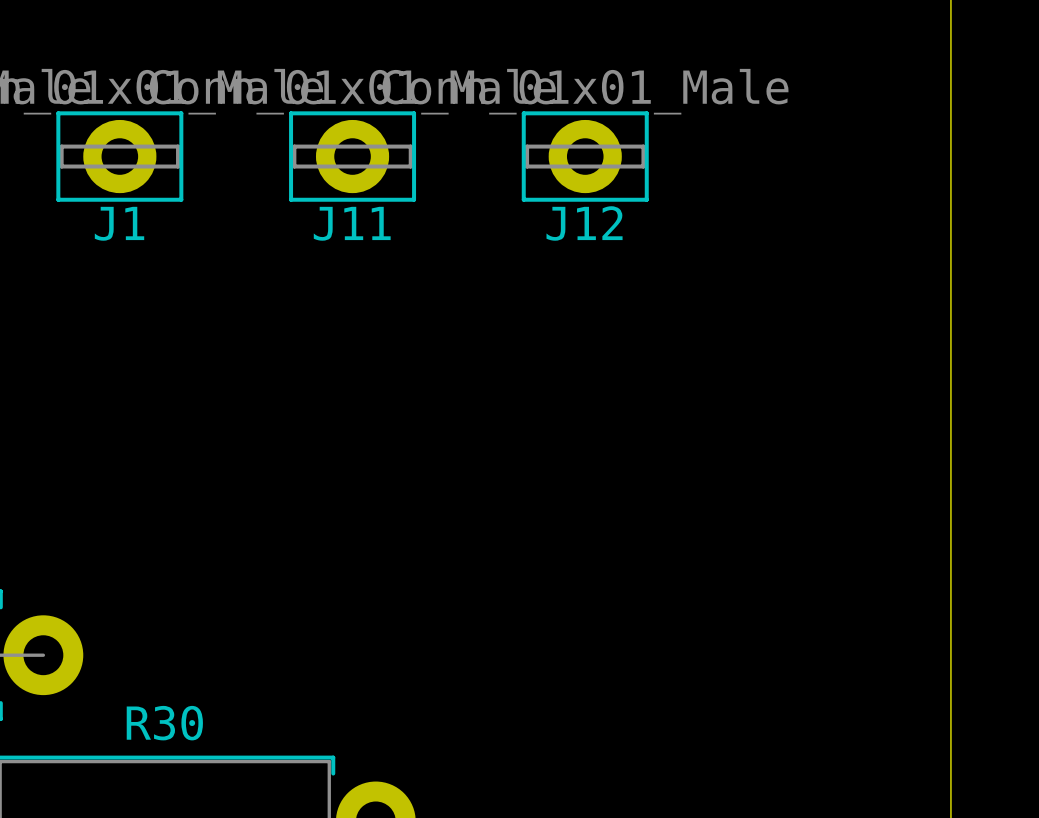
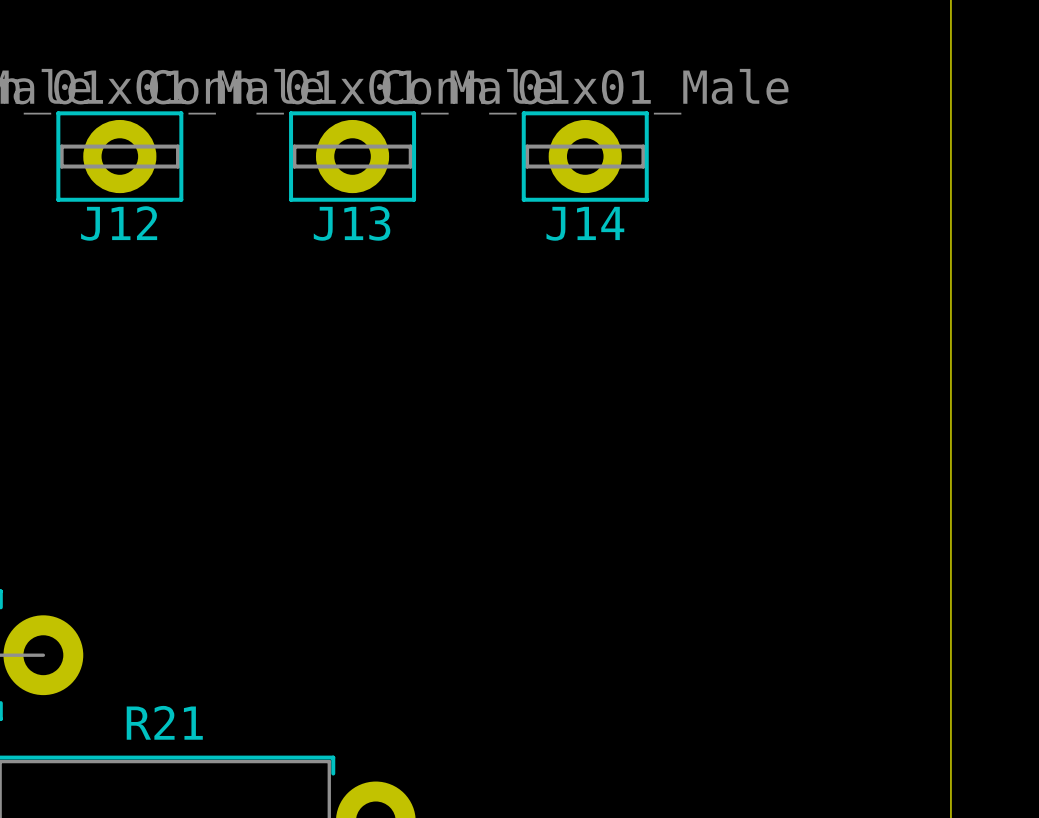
J1 name: J1 (119, 223) -> J12 (119, 223)
J11 name: J11 (352, 223) -> J13 (352, 223)
J12 name: J12 (584, 223) -> J14 (585, 223)
R30 name: R30 (164, 723) -> R21 (164, 722)

